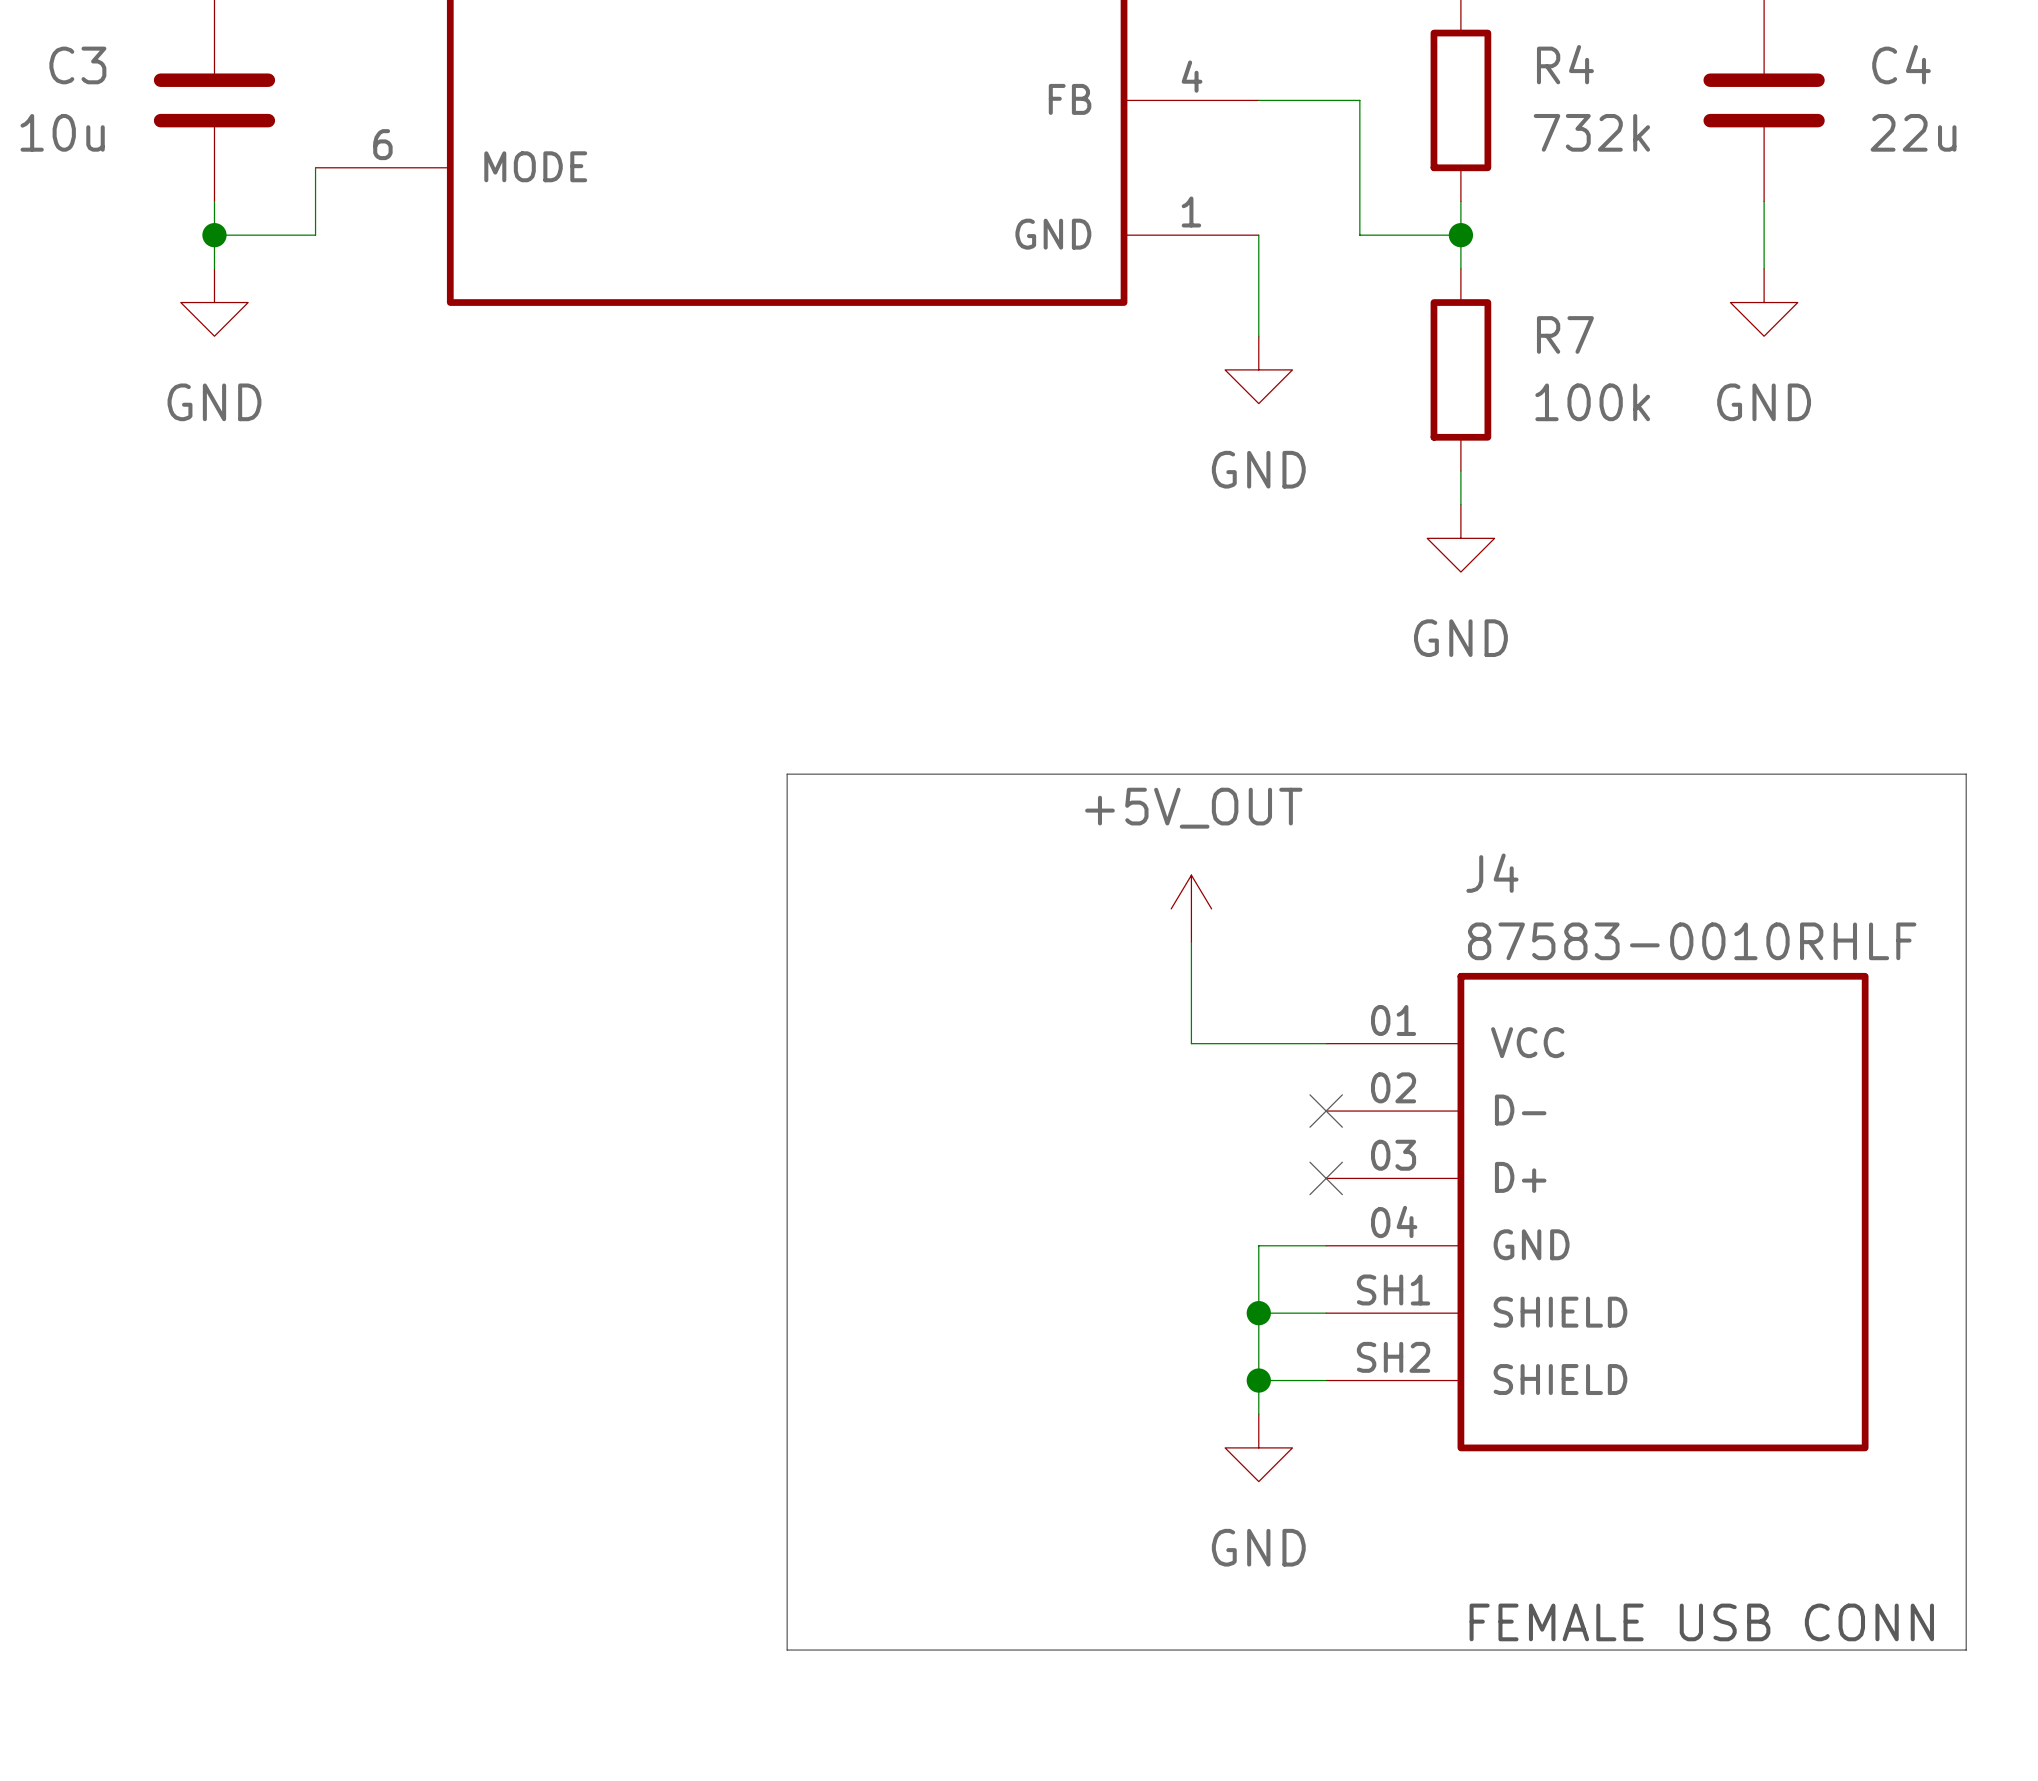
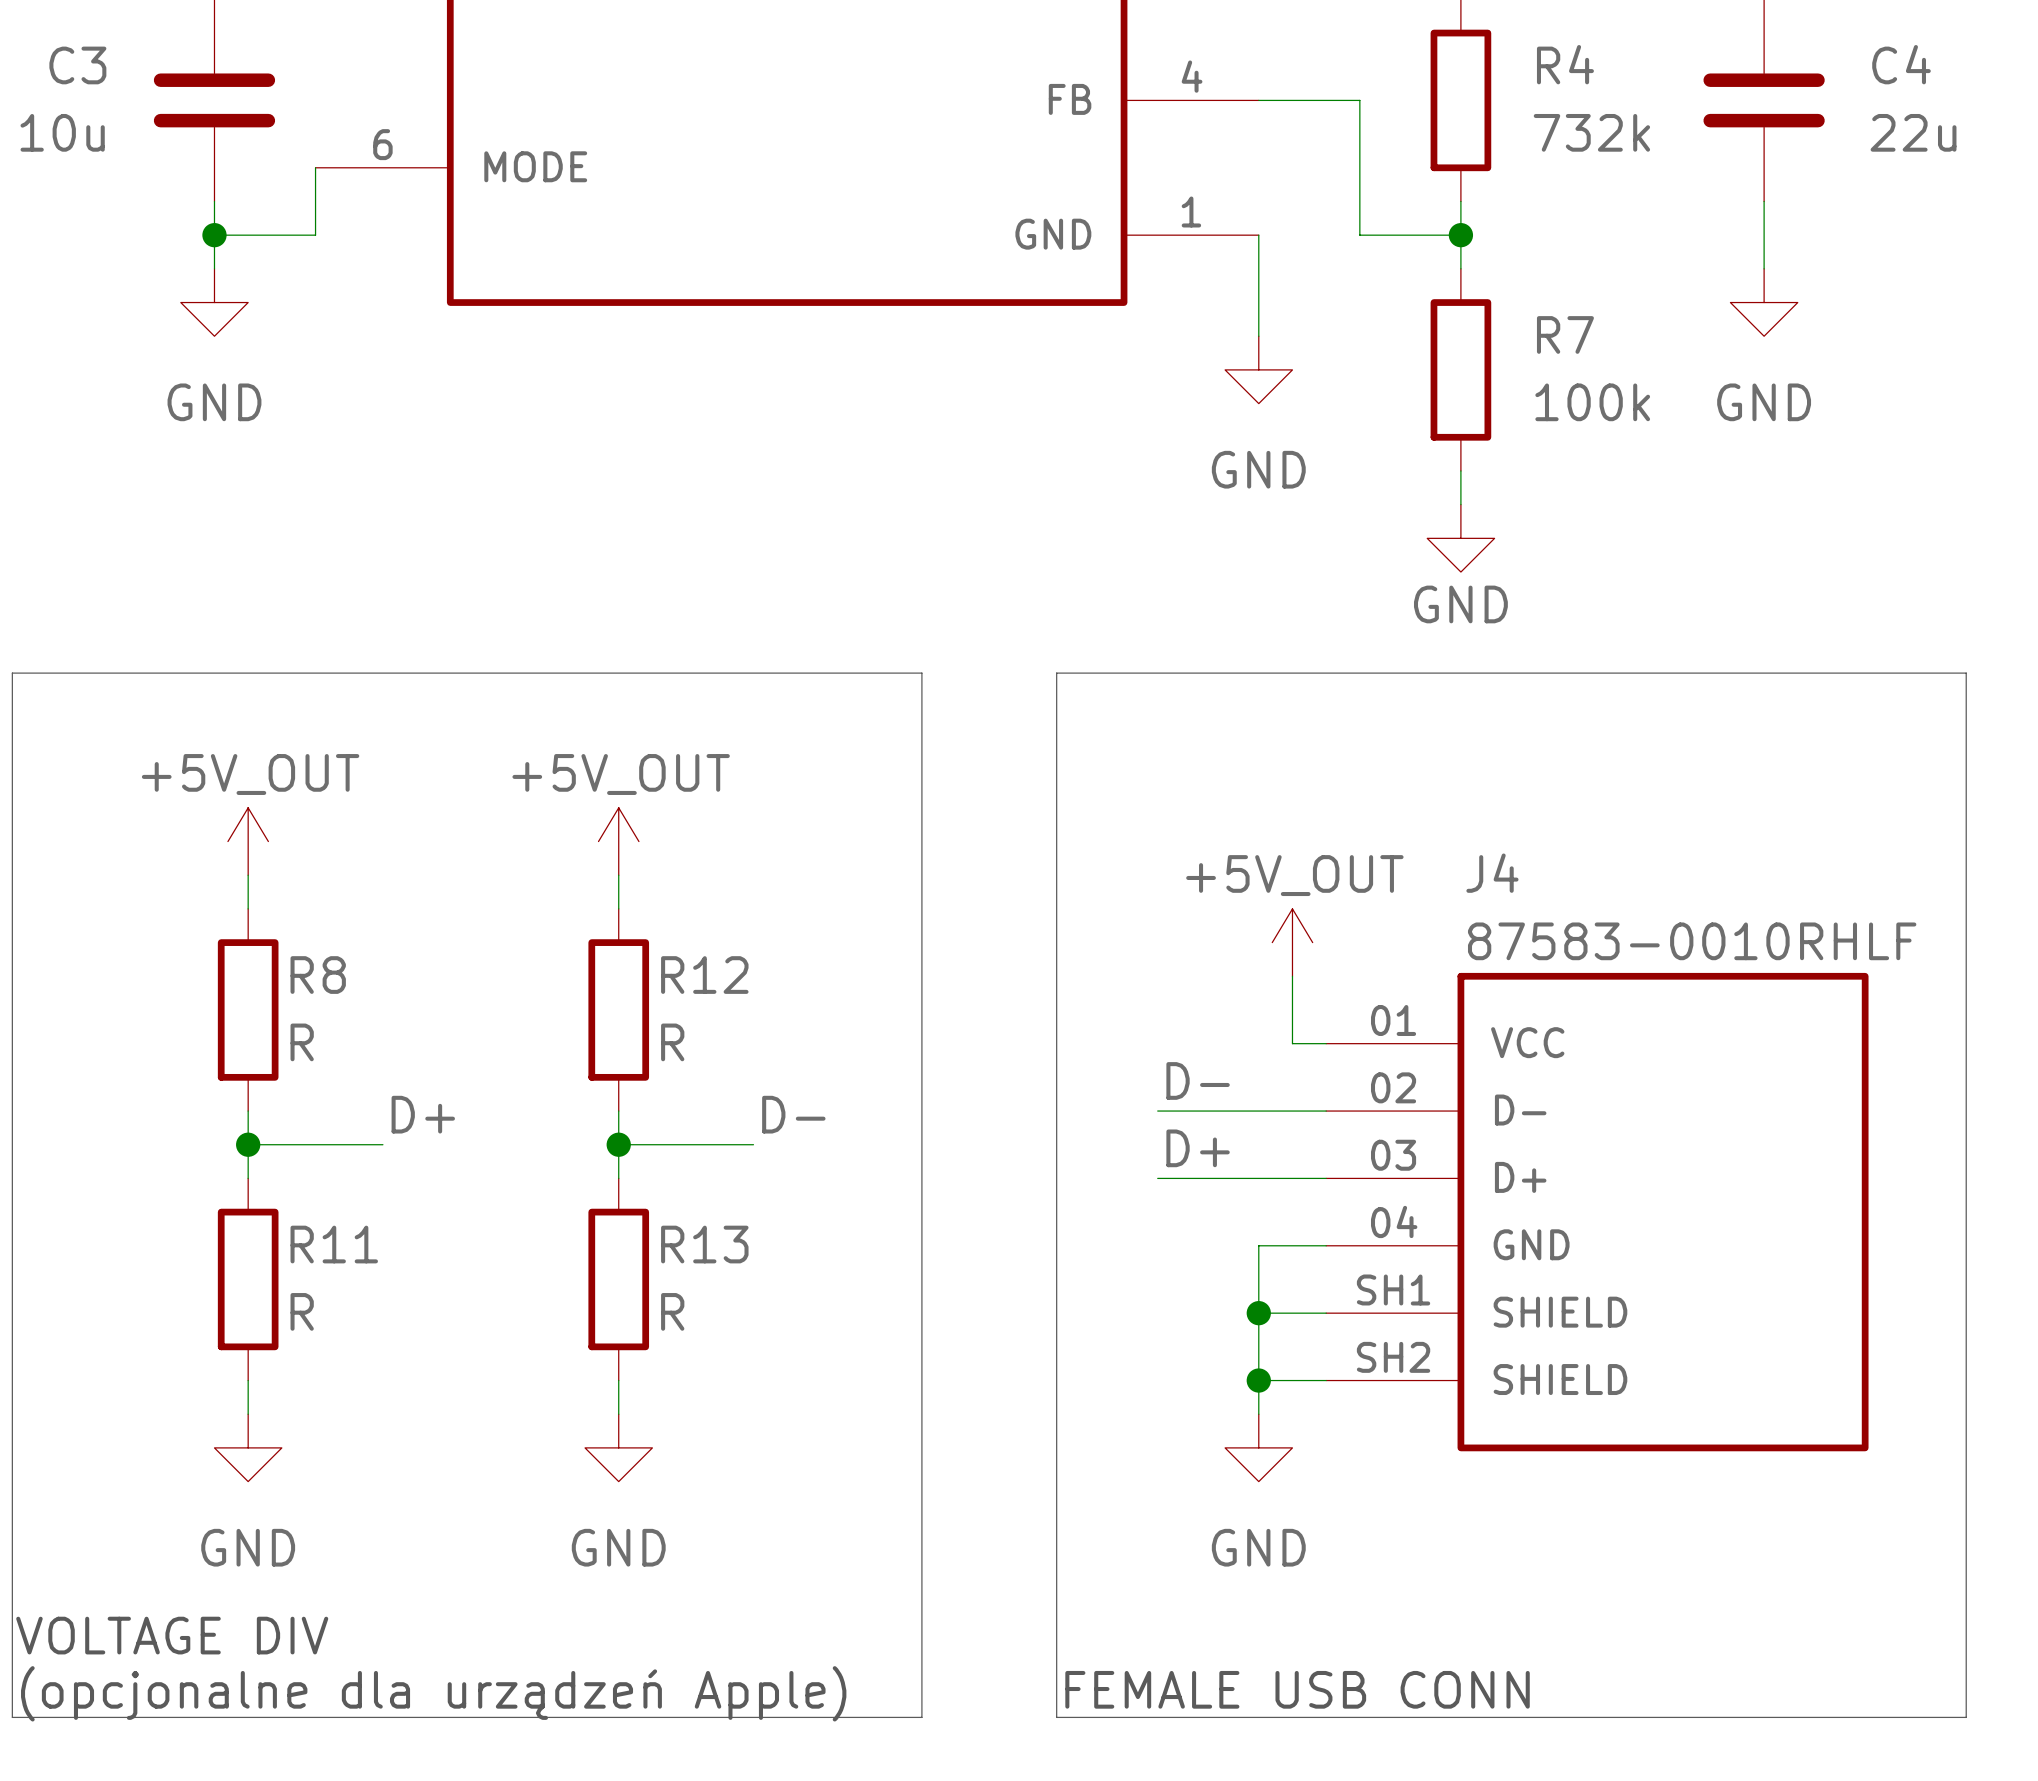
power symbol text position: GND (1460, 638) -> GND (1460, 604)
line: none -> (12, 673) (921, 673) (921, 1717) (12, 1717) (12, 673)
line: (1966, 774) (787, 774) (787, 1650) (1966, 1650) -> (1966, 774) (1966, 673) (1056, 673) (1056, 1717) (1966, 1717) (1966, 1650)
power symbol text position: +5V_OUT (1193, 808) -> +5V_OUT (1294, 875)
power symbol: none -> +5V_OUT (248, 841)
power symbol: none -> +5V_OUT (618, 841)
wire: none -> (248, 875) (248, 908)
wire: none -> (618, 875) (618, 908)
power symbol position: +5V_OUT (1191, 908) -> +5V_OUT (1292, 942)
wire: (1191, 942) (1191, 1043) (1292, 1043) -> (1292, 976) (1292, 1043)
R8: none -> R (248, 1009)
R12: none -> R (618, 1009)
label: none -> D- (1198, 1080)
wire: none -> (248, 1111) (248, 1178)
wire: none -> (618, 1111) (618, 1178)
wire: none -> (1157, 1111) (1326, 1111)
no-connect mark: (1326, 1111) -> none
label: none -> D+ (423, 1114)
label: none -> D- (793, 1114)
wire: none -> (248, 1144) (382, 1144)
junction: none -> (248, 1144)
wire: none -> (618, 1144) (753, 1144)
junction: none -> (618, 1144)
label: none -> D+ (1198, 1148)
wire: none -> (1157, 1178) (1326, 1178)
no-connect mark: (1326, 1178) -> none
R11: none -> R (248, 1279)
R13: none -> R (618, 1279)
wire: none -> (248, 1380) (248, 1414)
wire: none -> (618, 1380) (618, 1414)
power symbol: none -> GND (248, 1447)
power symbol: none -> GND (618, 1447)
text position: FEMALE USB CONN (1701, 1622) -> FEMALE USB CONN (1297, 1689)
text: none -> VOLTAGE DIV (172, 1635)
text: none -> (opcjonalne dla urządzeń Apple) (433, 1693)

